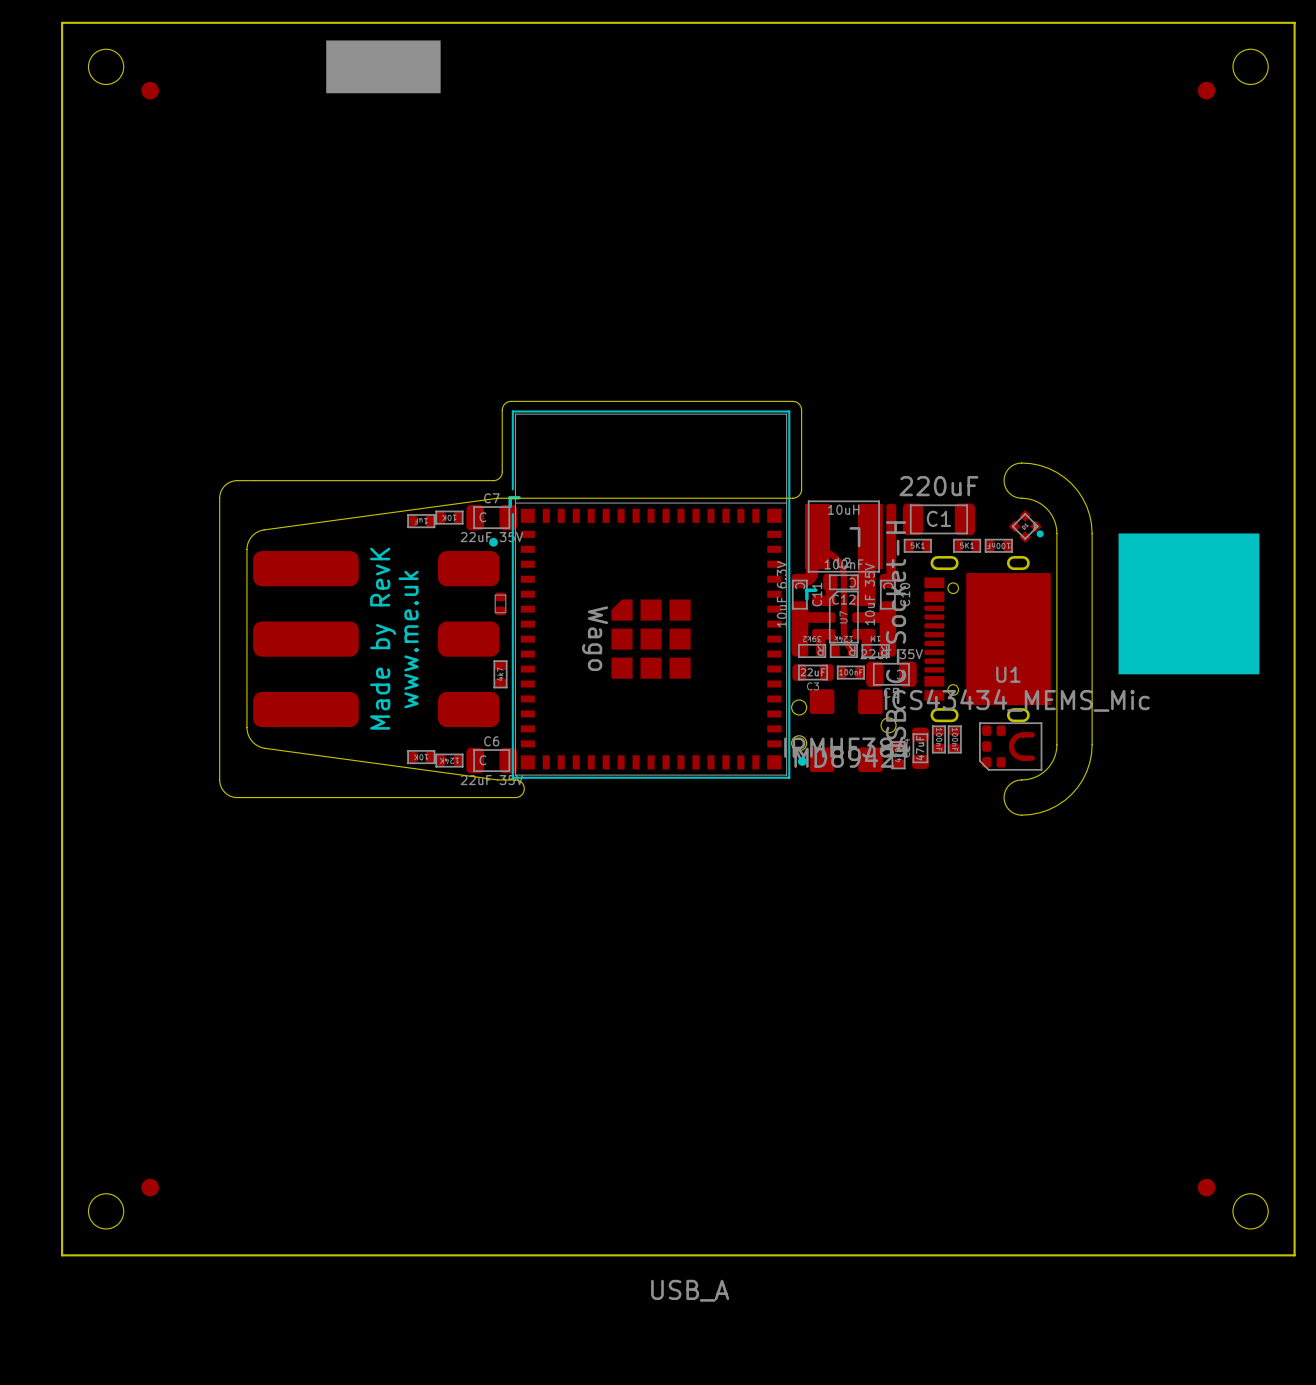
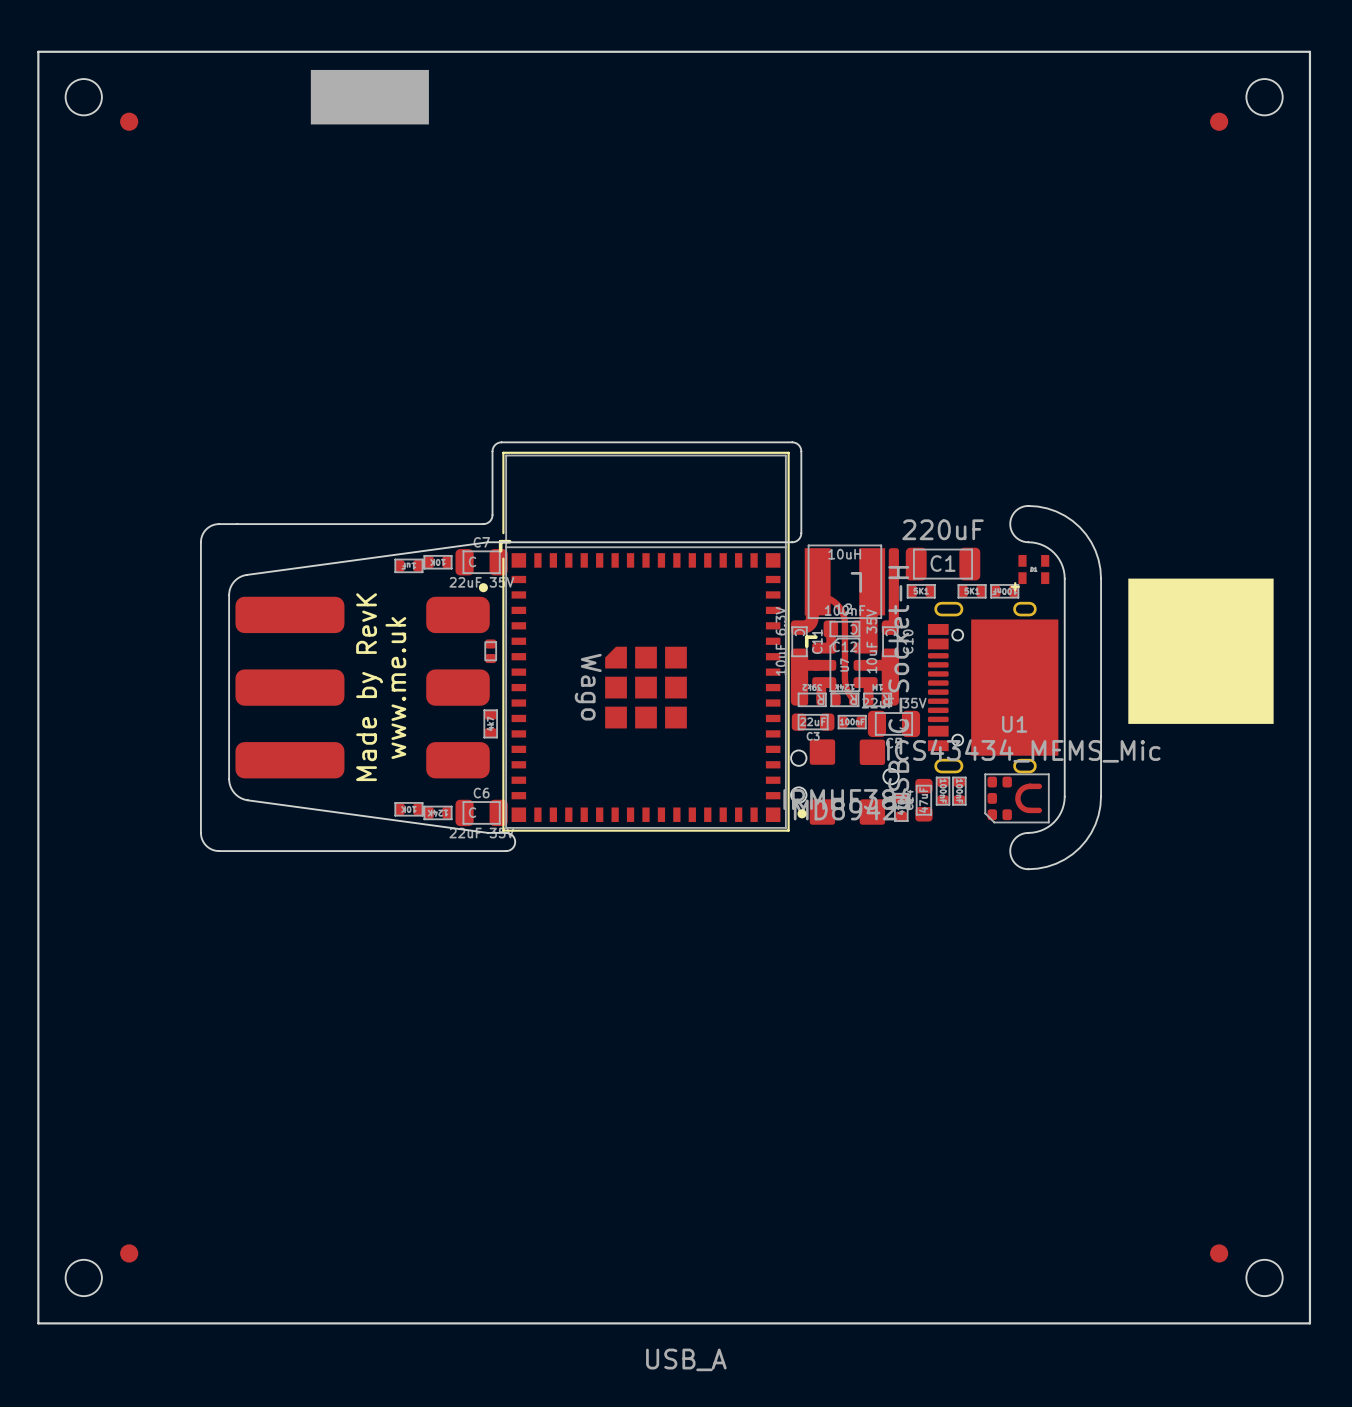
part footprint: [1008, 510, 1044, 543] -> [1010, 554, 1050, 592]

